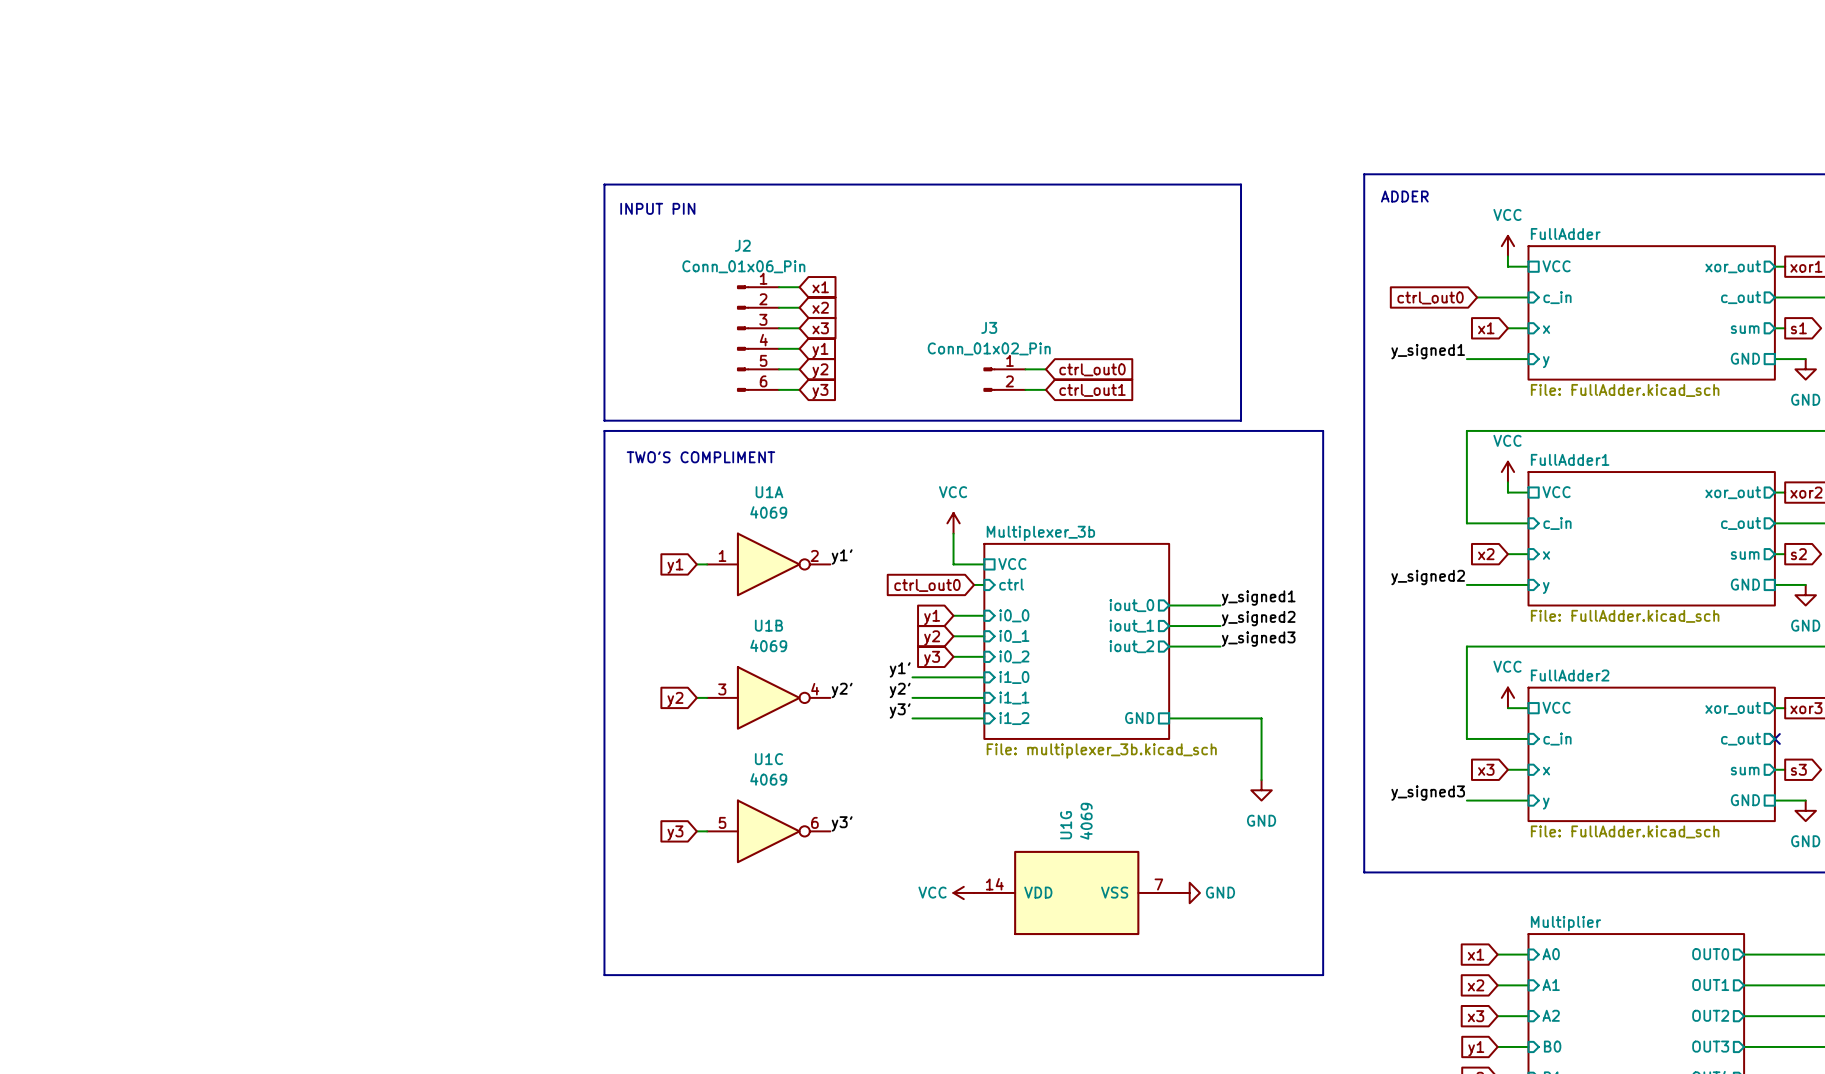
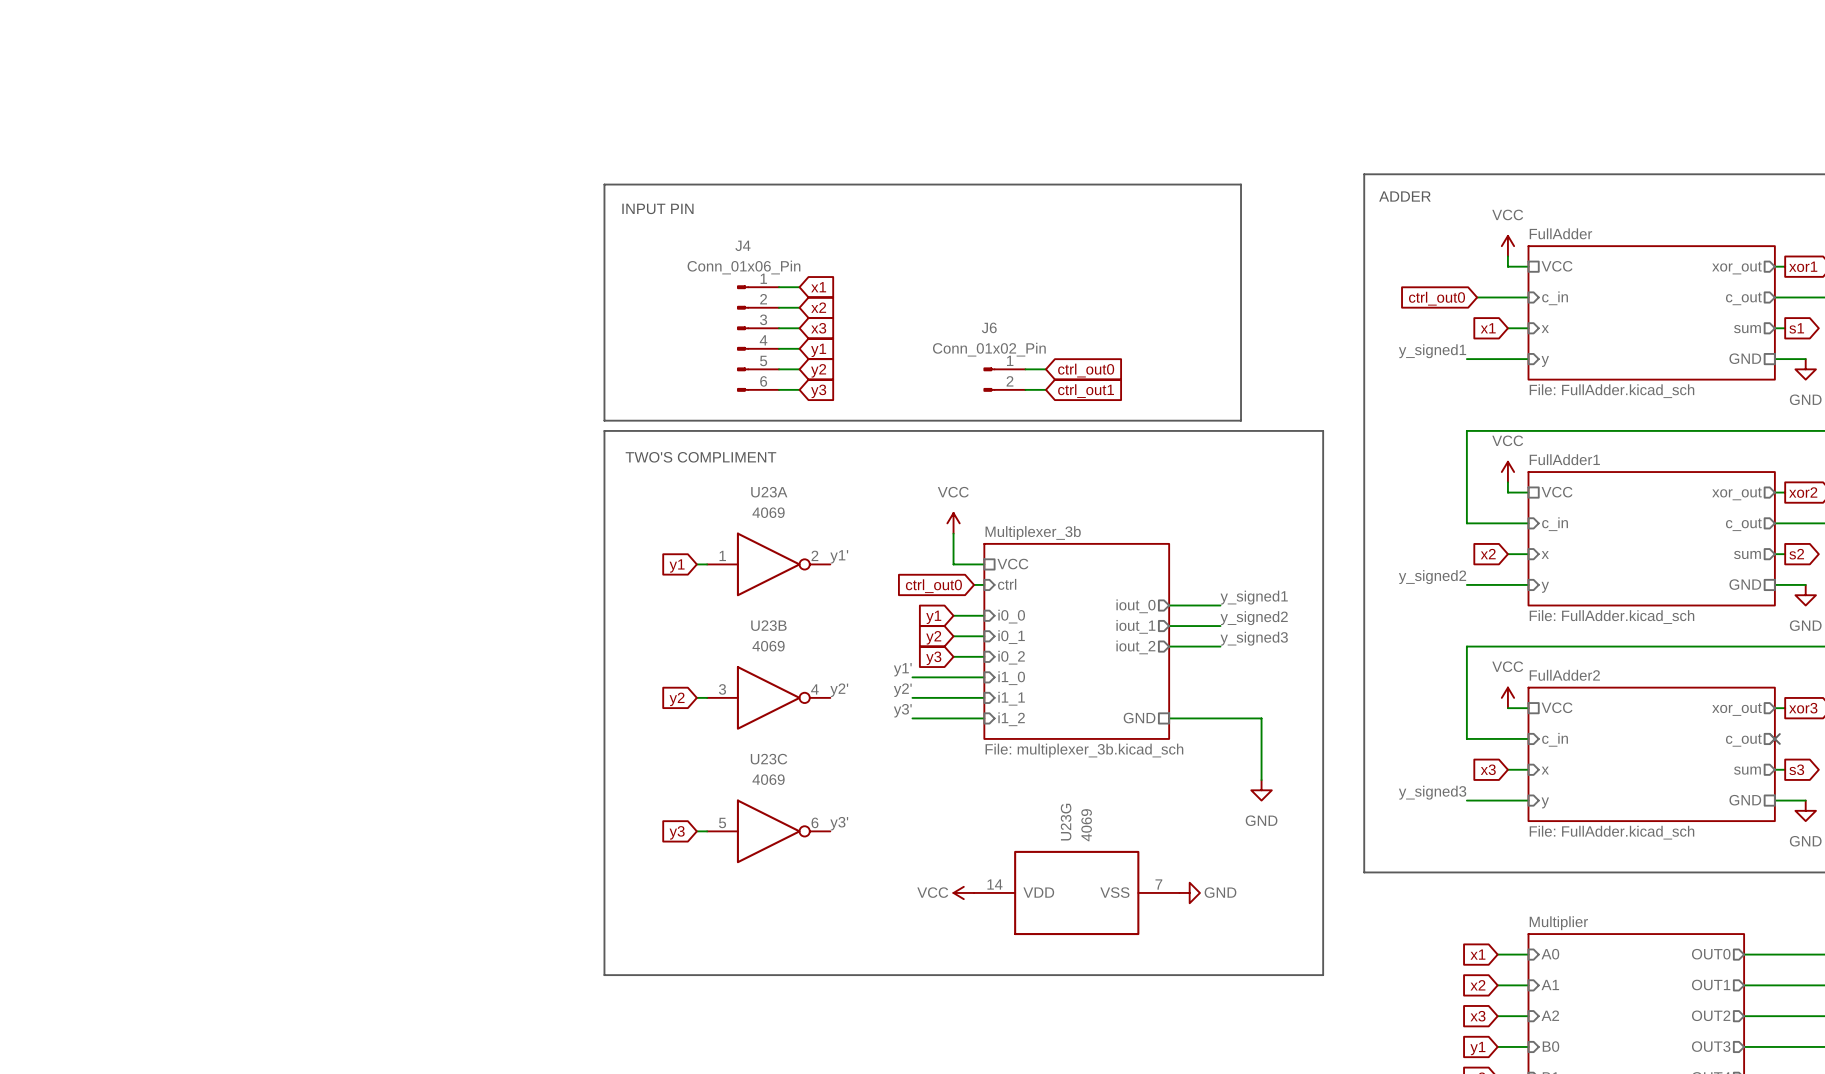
J2 name: J2 (742, 245) -> J4 (742, 245)
J3 name: J3 (989, 327) -> J6 (989, 327)
U1A name: U1A (769, 492) -> U23A (769, 492)
U1B name: U1B (768, 625) -> U23B (768, 625)
U1C name: U1C (768, 759) -> U23C (769, 759)
U1G name: U1G (1066, 825) -> U23G (1066, 822)

